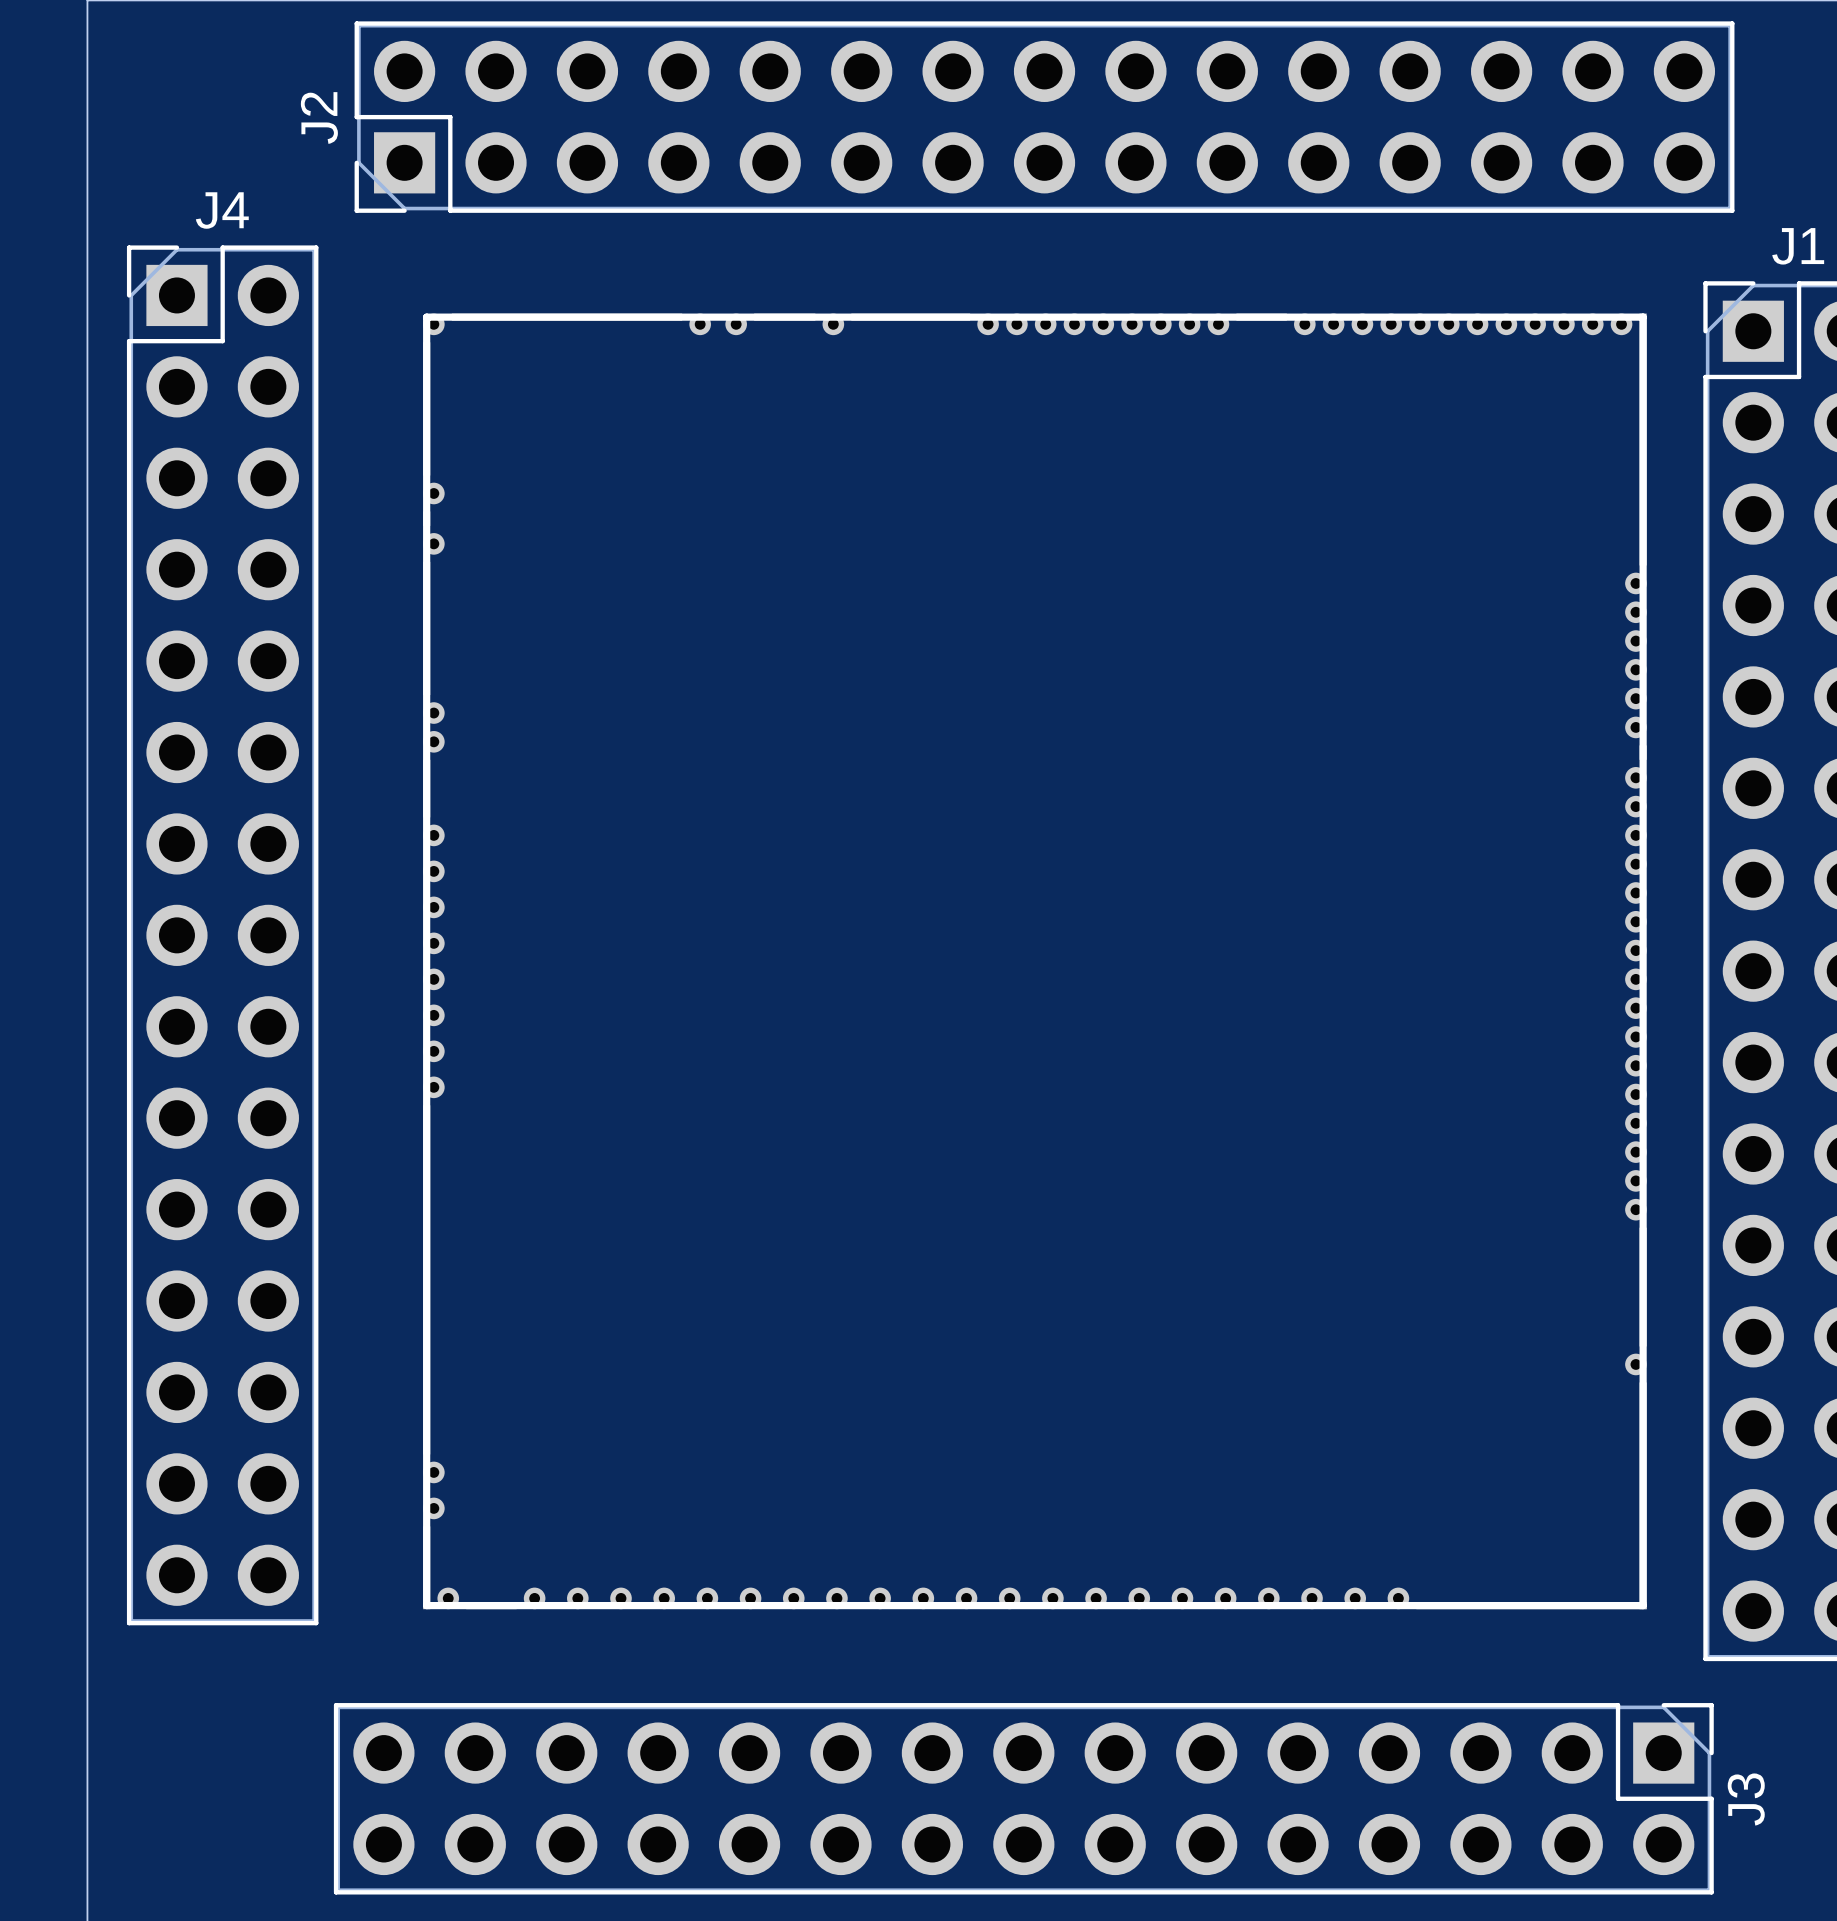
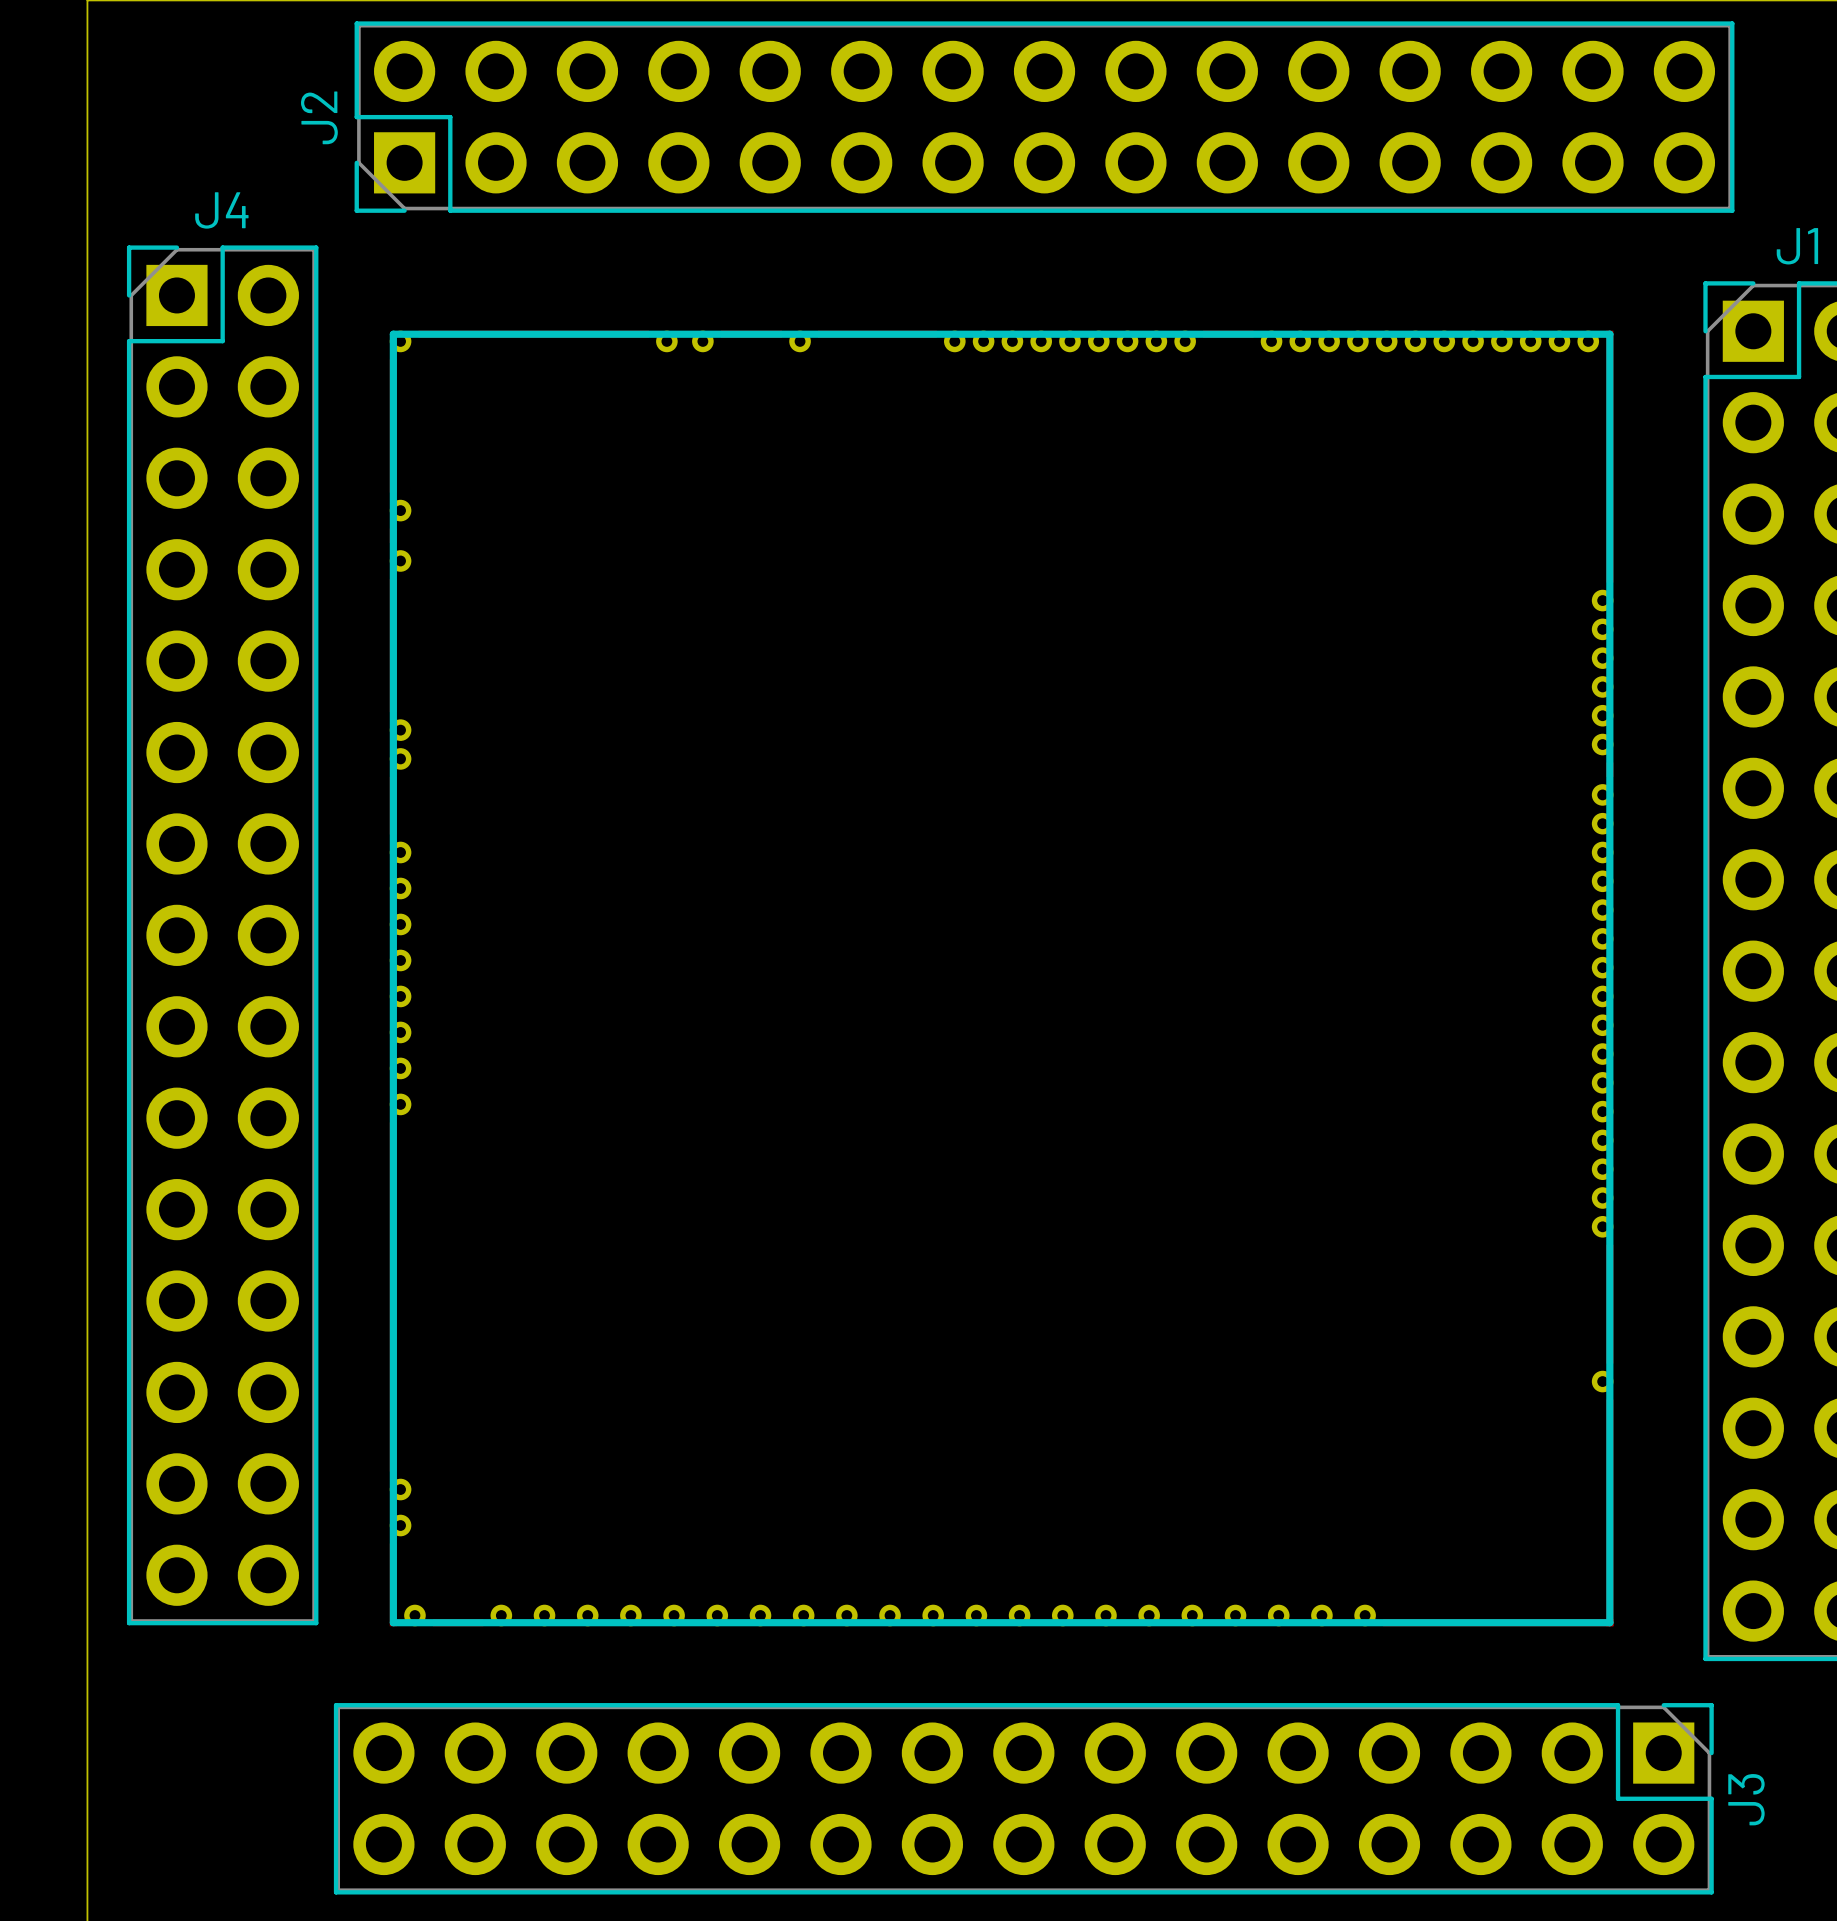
part position: (1034, 961) -> (1001, 978)

